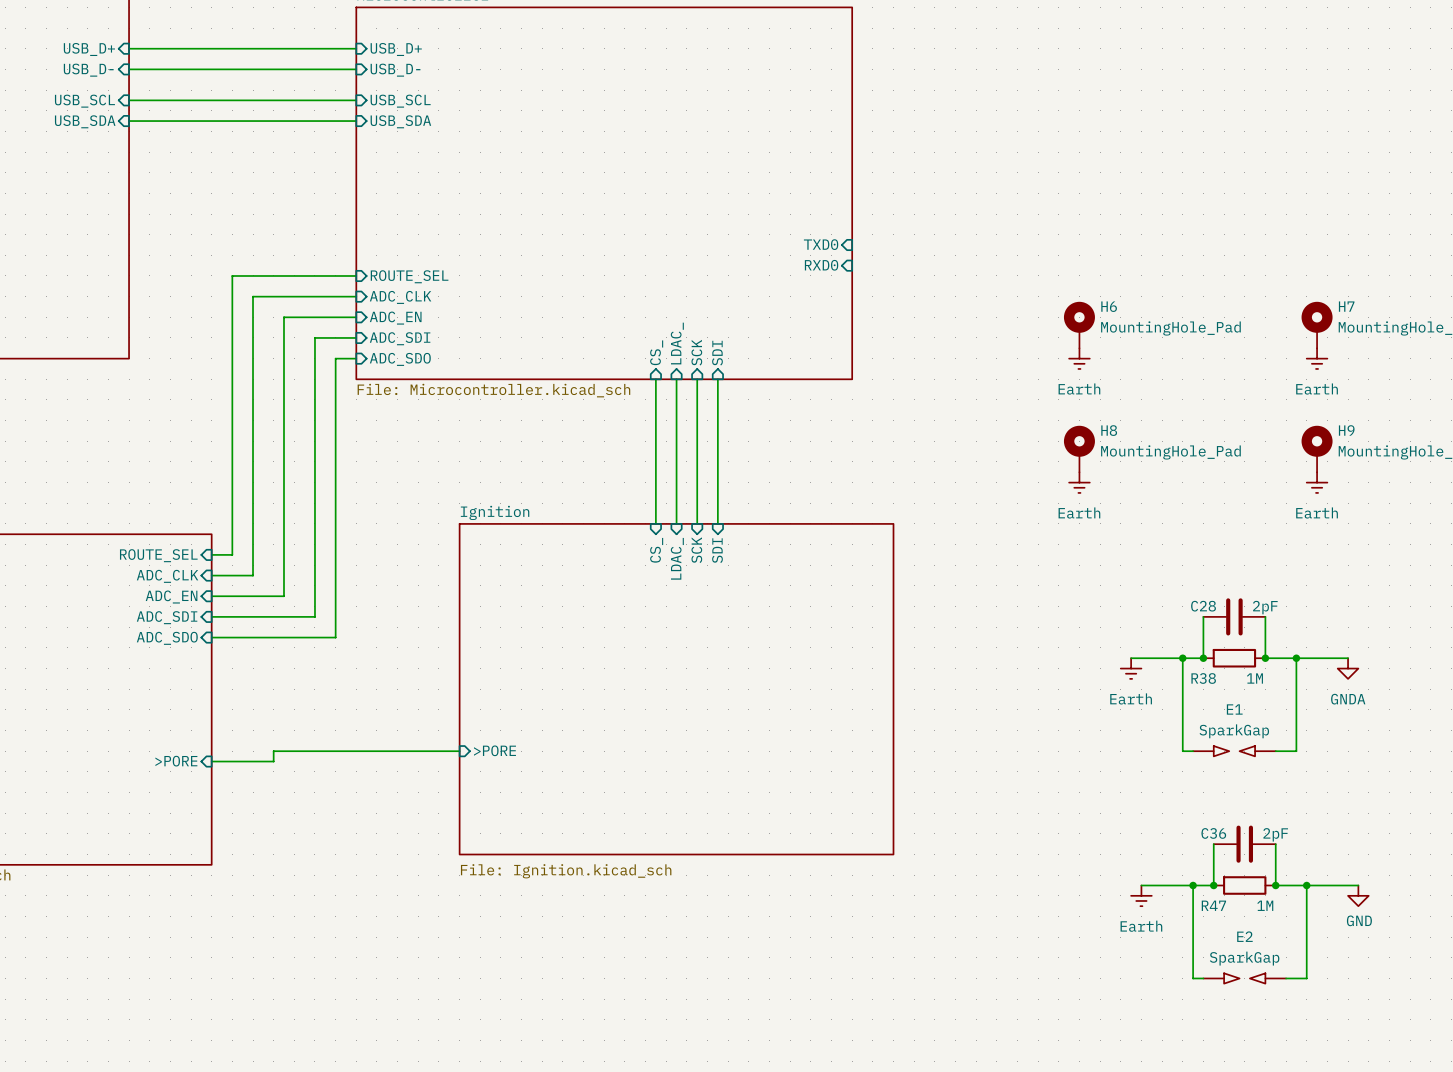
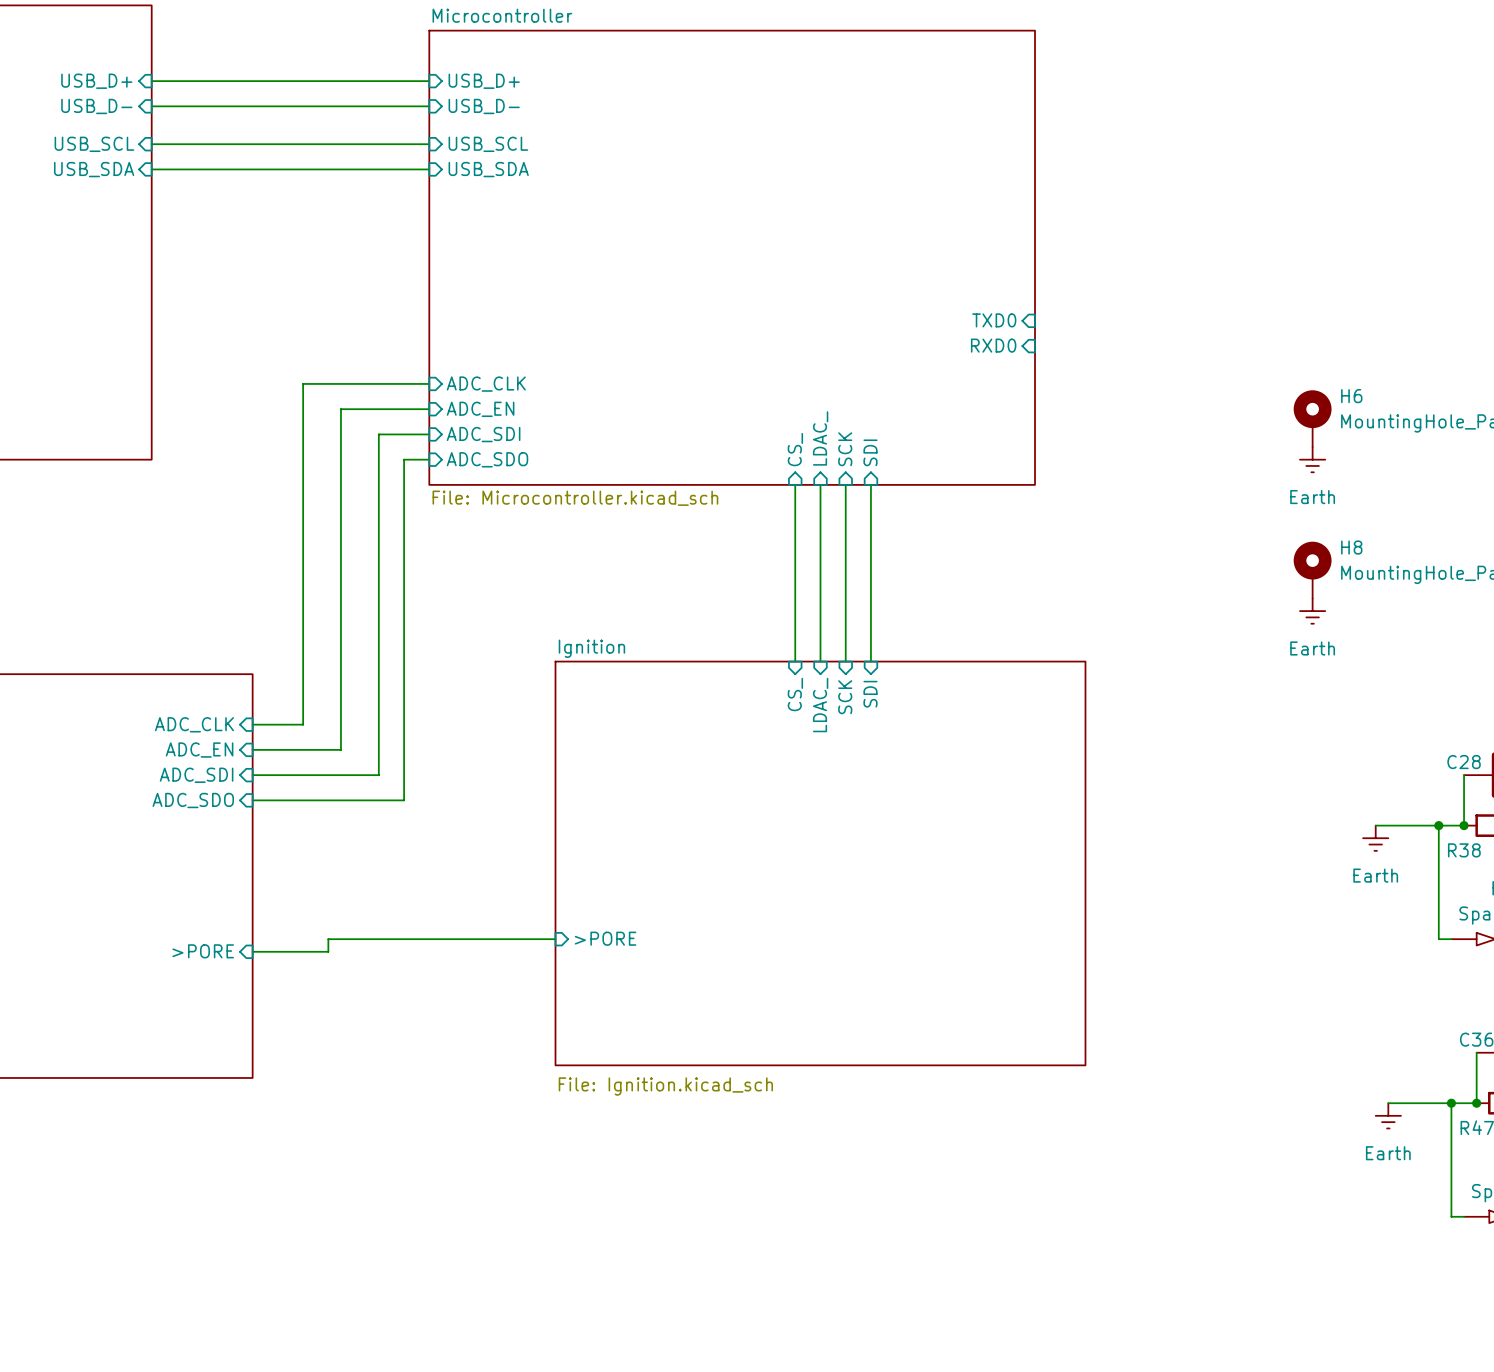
wire: (356, 275) (232, 275) (232, 554) (211, 554) -> none
sheet pin: ROUTE_SEL (409, 276) -> none
sheet pin: ROUTE_SEL (158, 555) -> none

